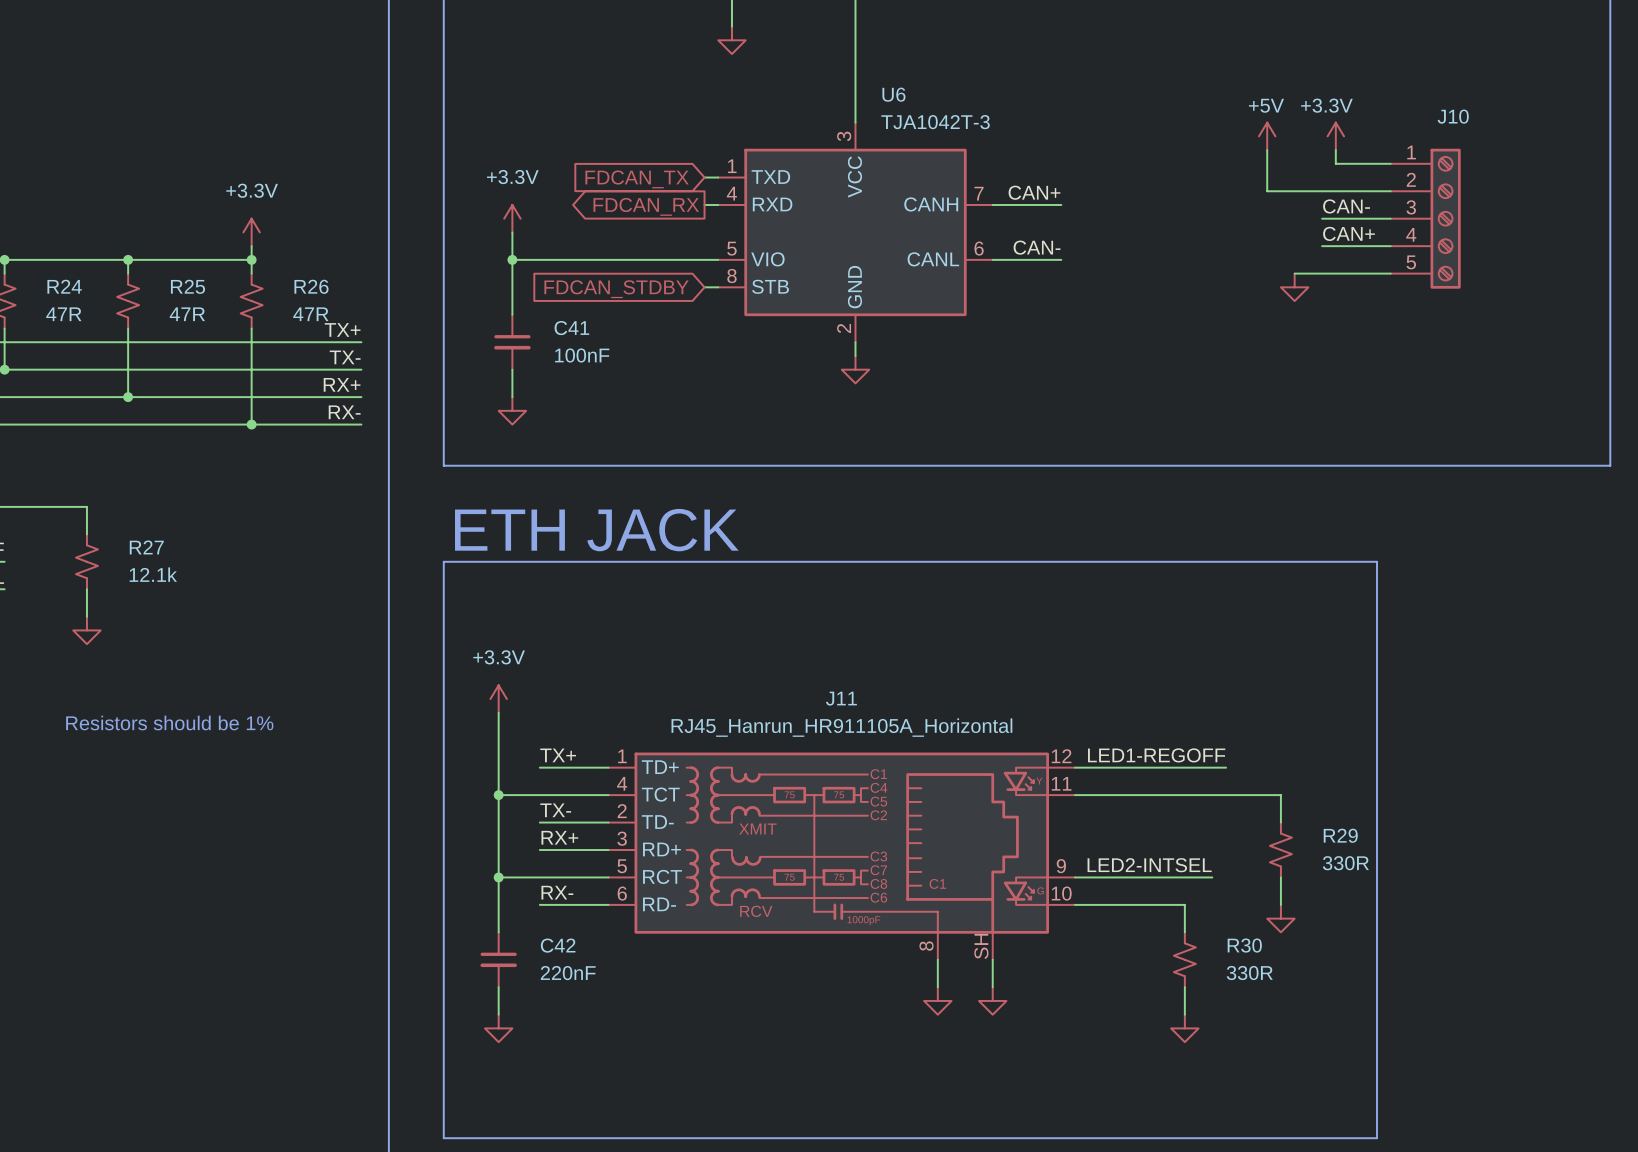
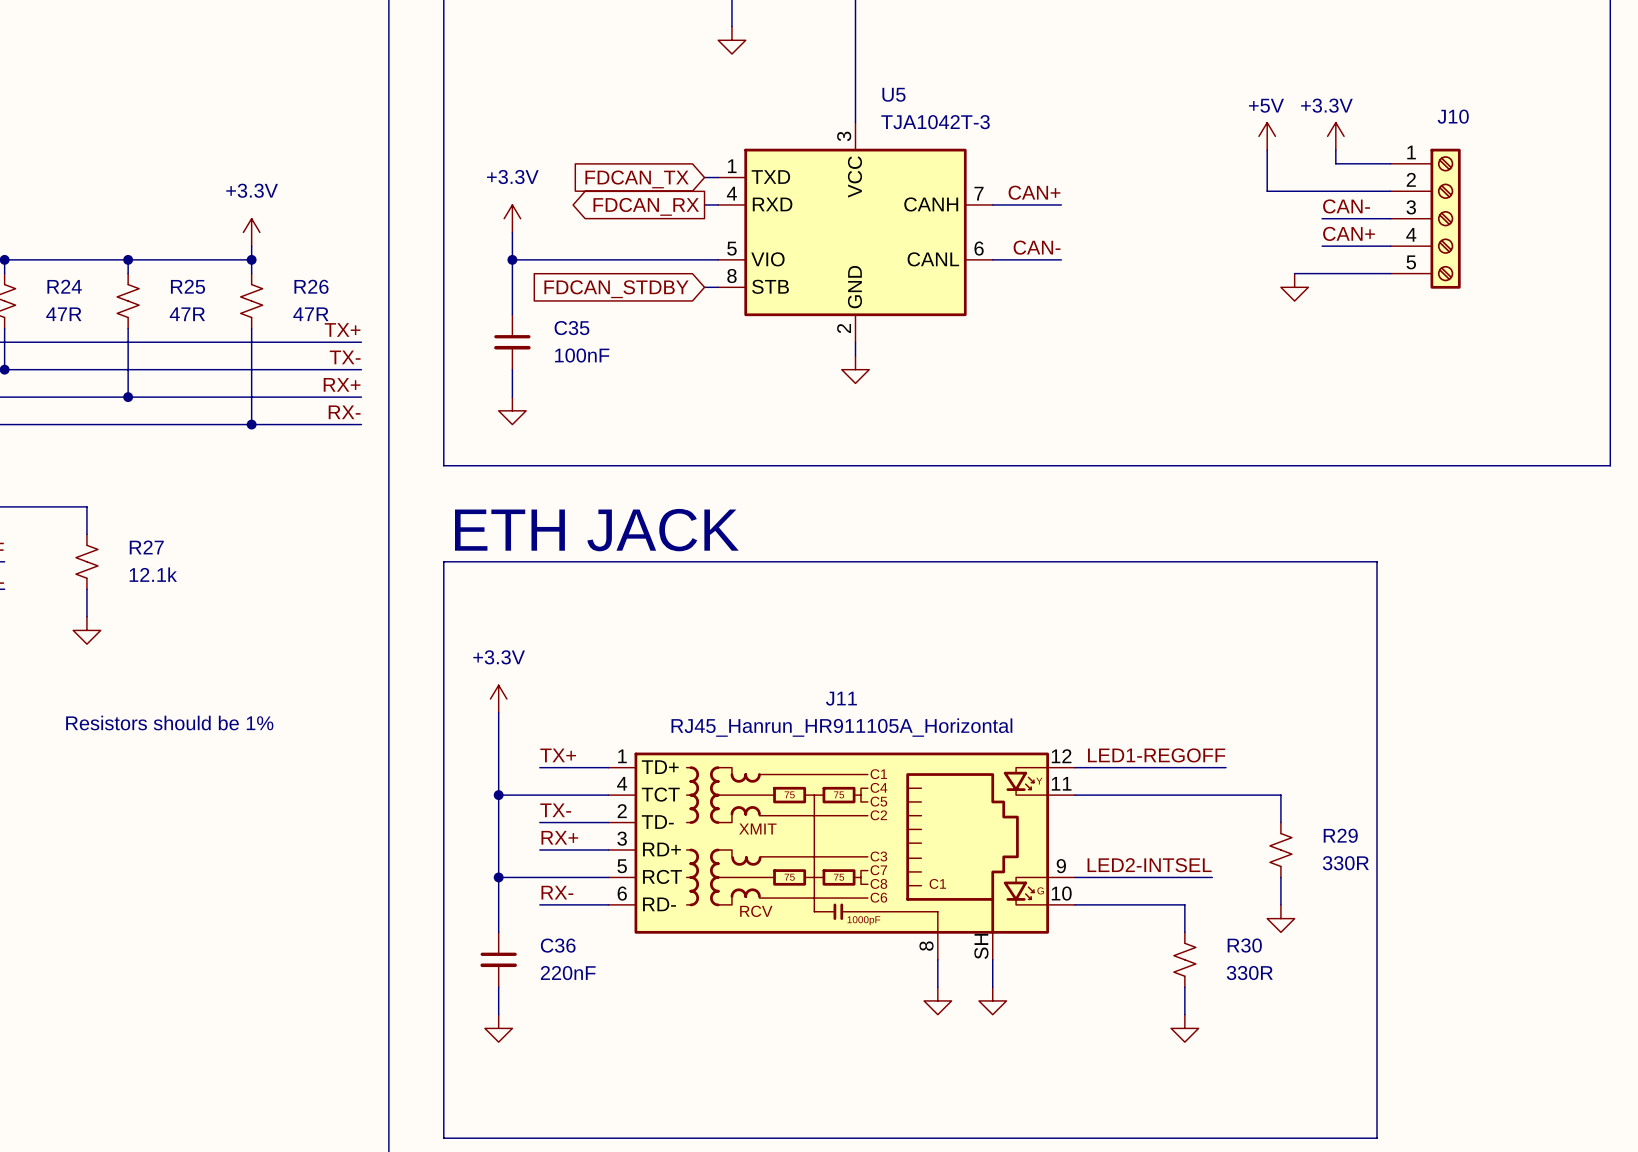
U6 name: U6 (893, 94) -> U5 (893, 94)
C41 name: C41 (571, 328) -> C35 (571, 328)
C42 name: C42 (558, 945) -> C36 (558, 945)

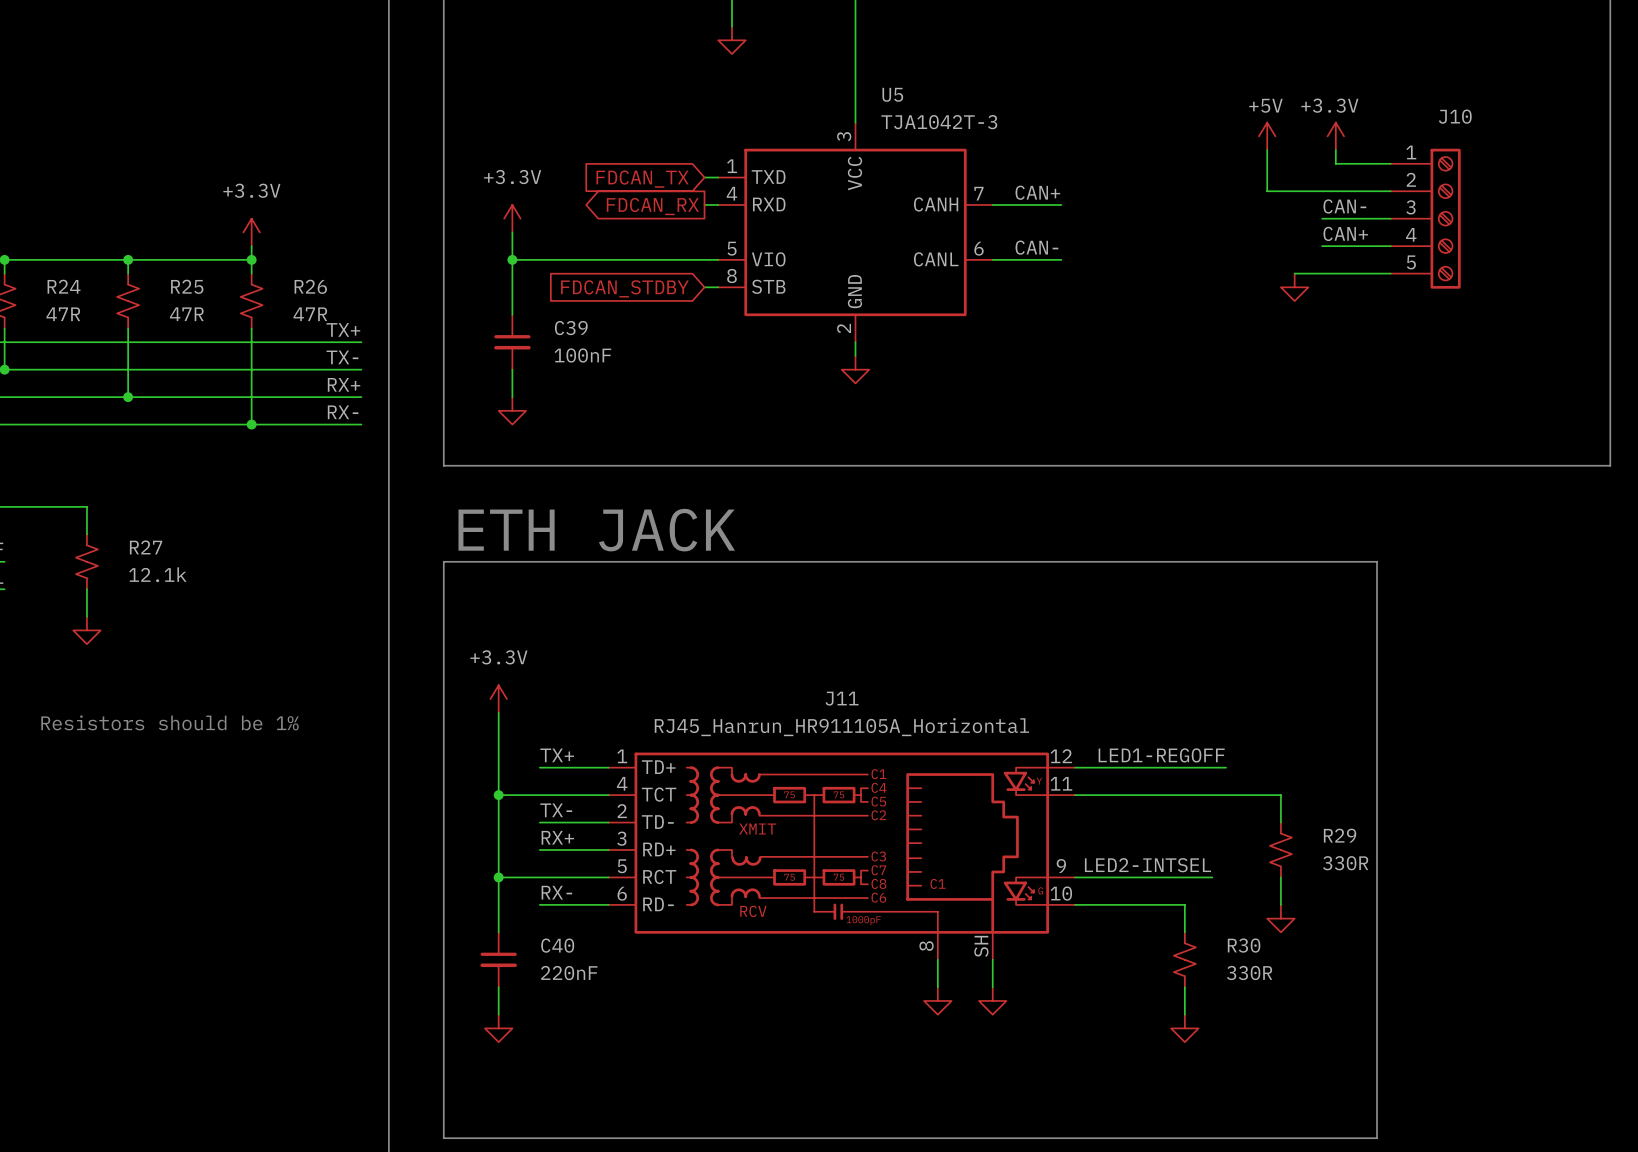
C35 name: C35 (571, 328) -> C39 (571, 328)
C36 name: C36 (558, 945) -> C40 (557, 945)

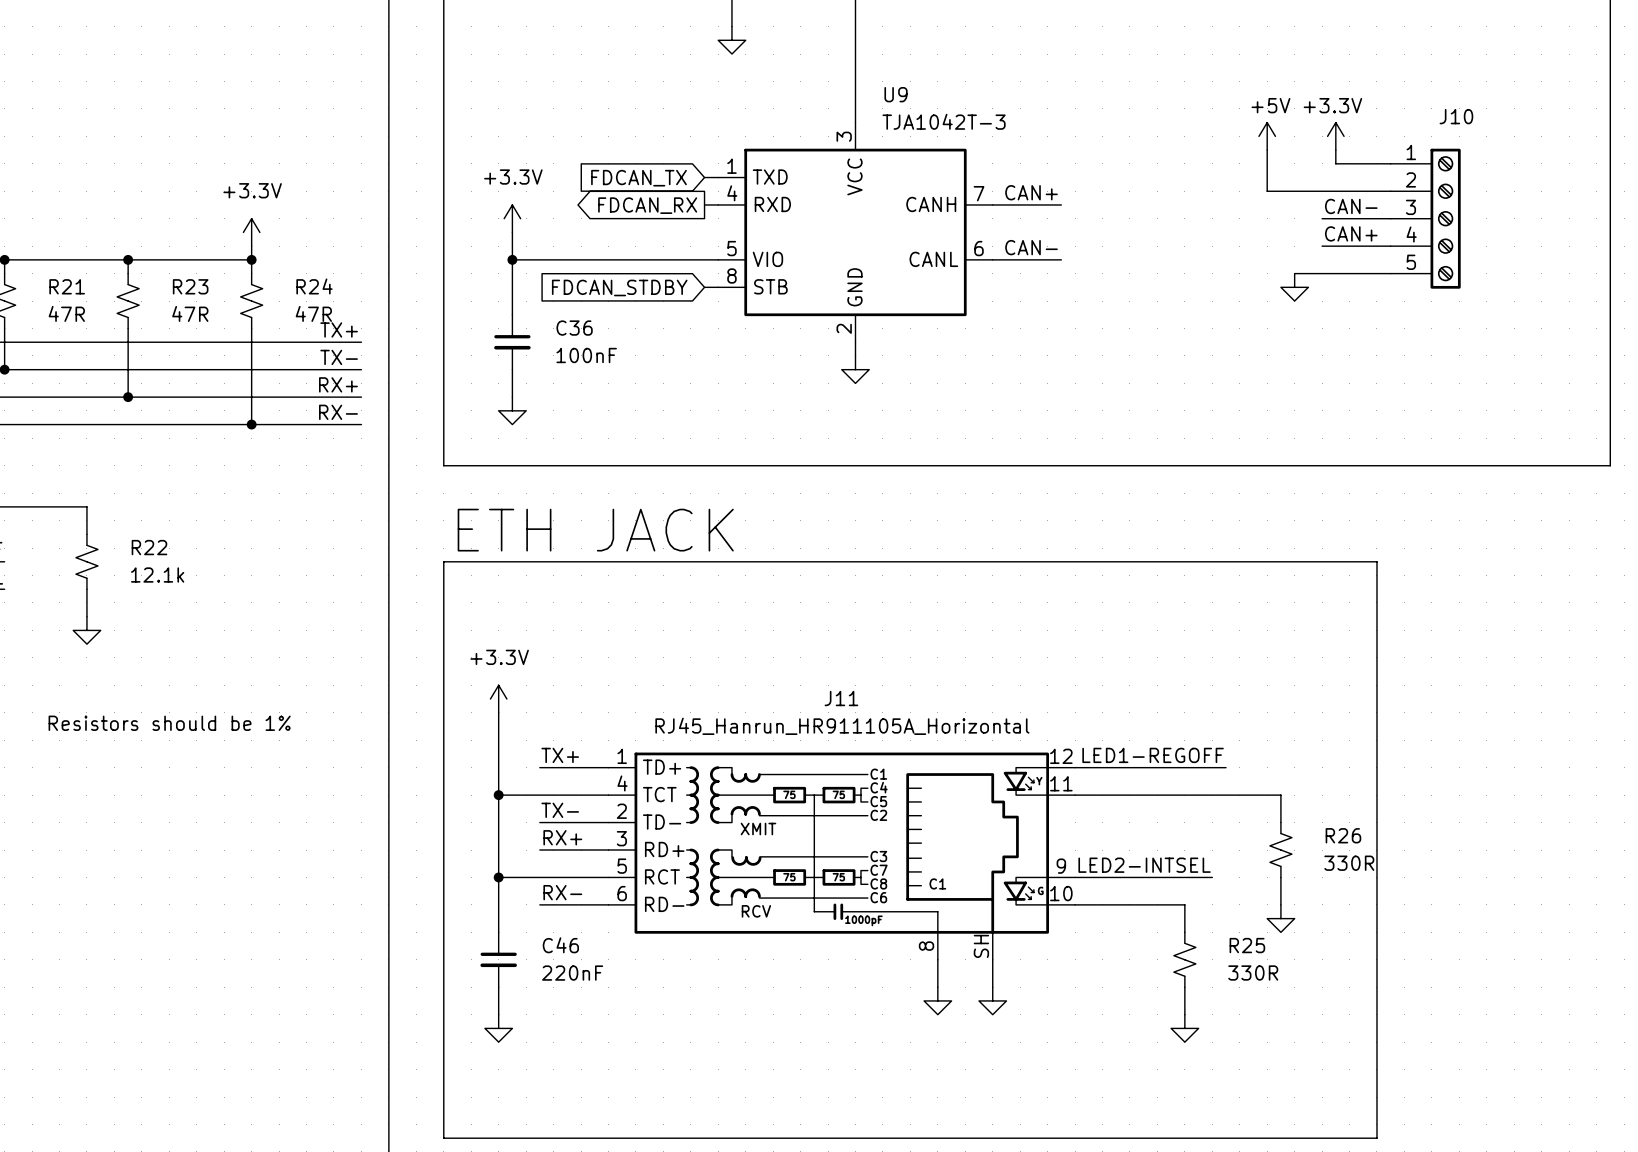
U5 name: U5 (892, 94) -> U9 (896, 94)
R24 name: R24 (64, 286) -> R21 (67, 286)
R25 name: R25 (187, 286) -> R23 (190, 286)
R26 name: R26 (310, 286) -> R24 (314, 286)
C39 name: C39 (571, 328) -> C36 (574, 328)
R27 name: R27 (146, 547) -> R22 (149, 547)
R29 name: R29 (1340, 835) -> R26 (1343, 835)
C40 name: C40 (557, 945) -> C46 (560, 945)
R30 name: R30 (1244, 945) -> R25 (1247, 945)

